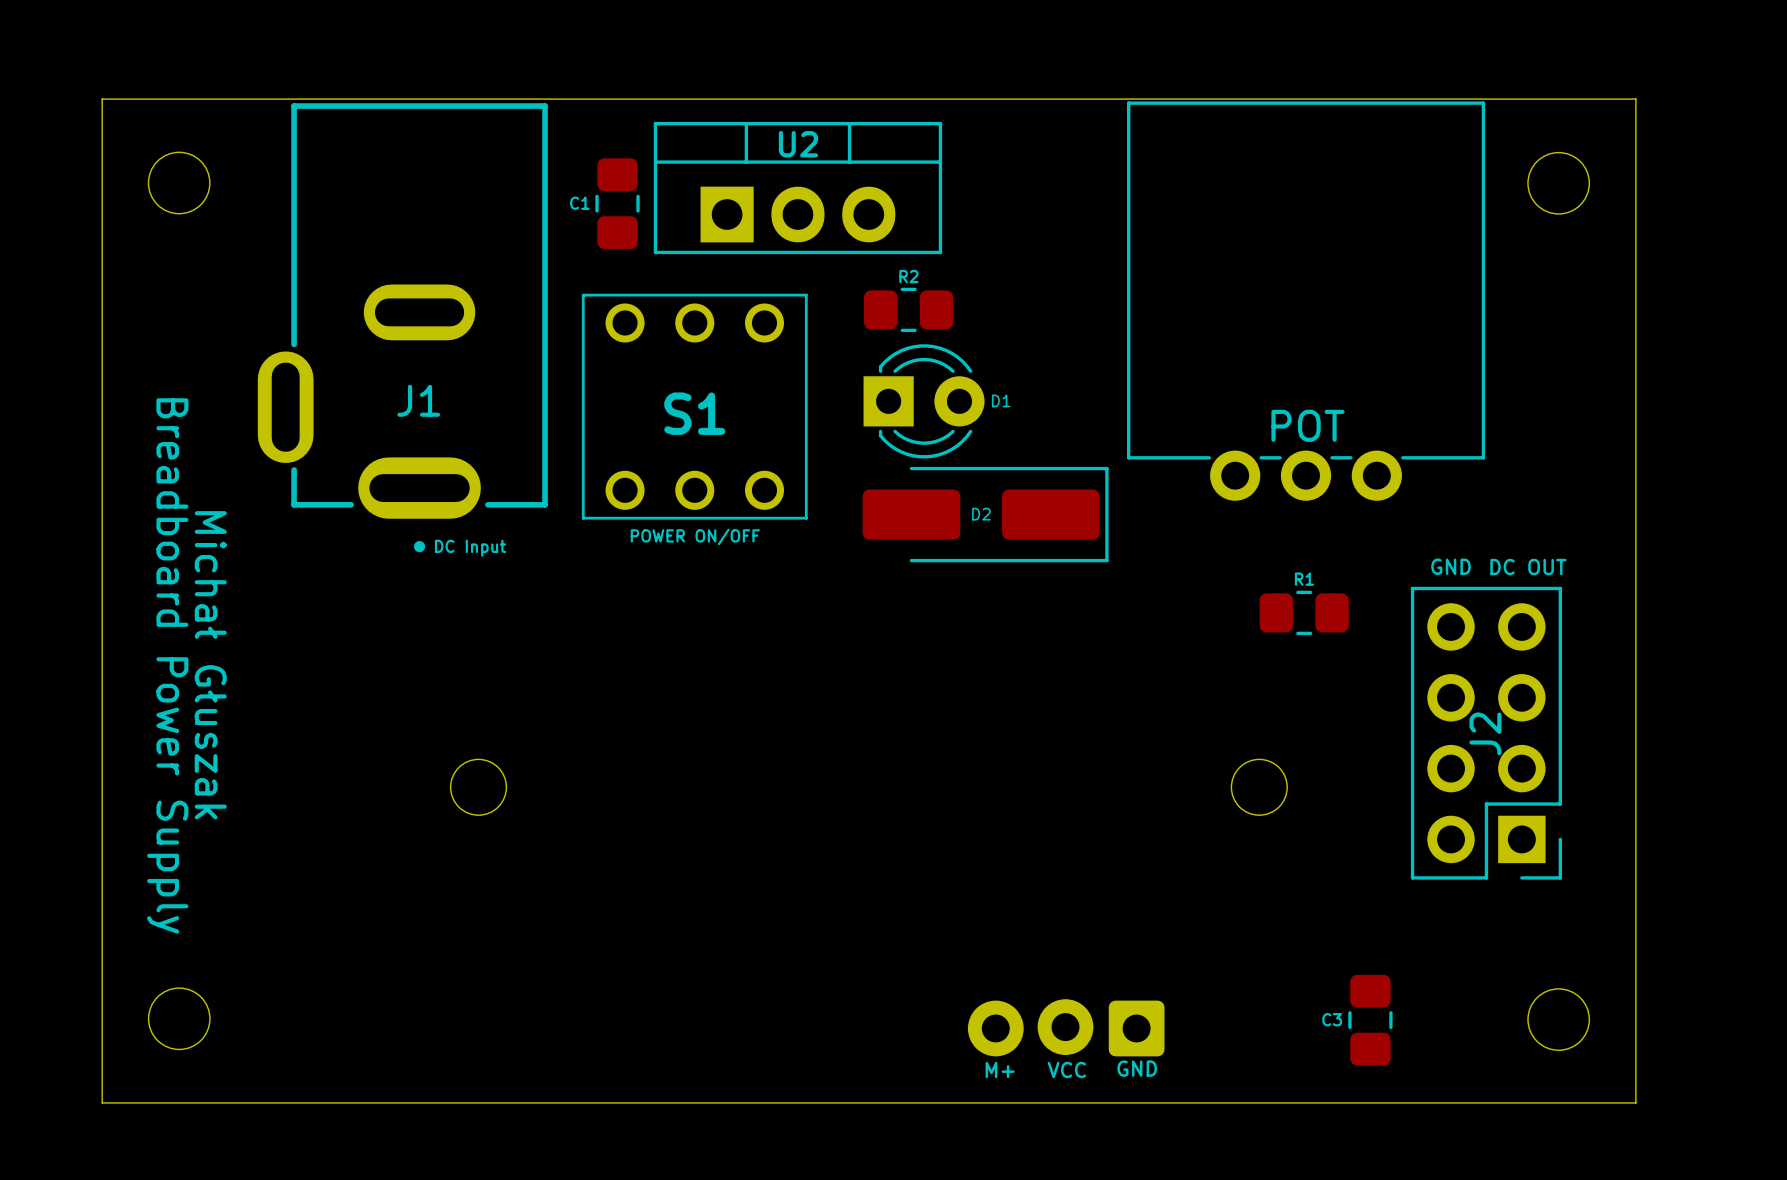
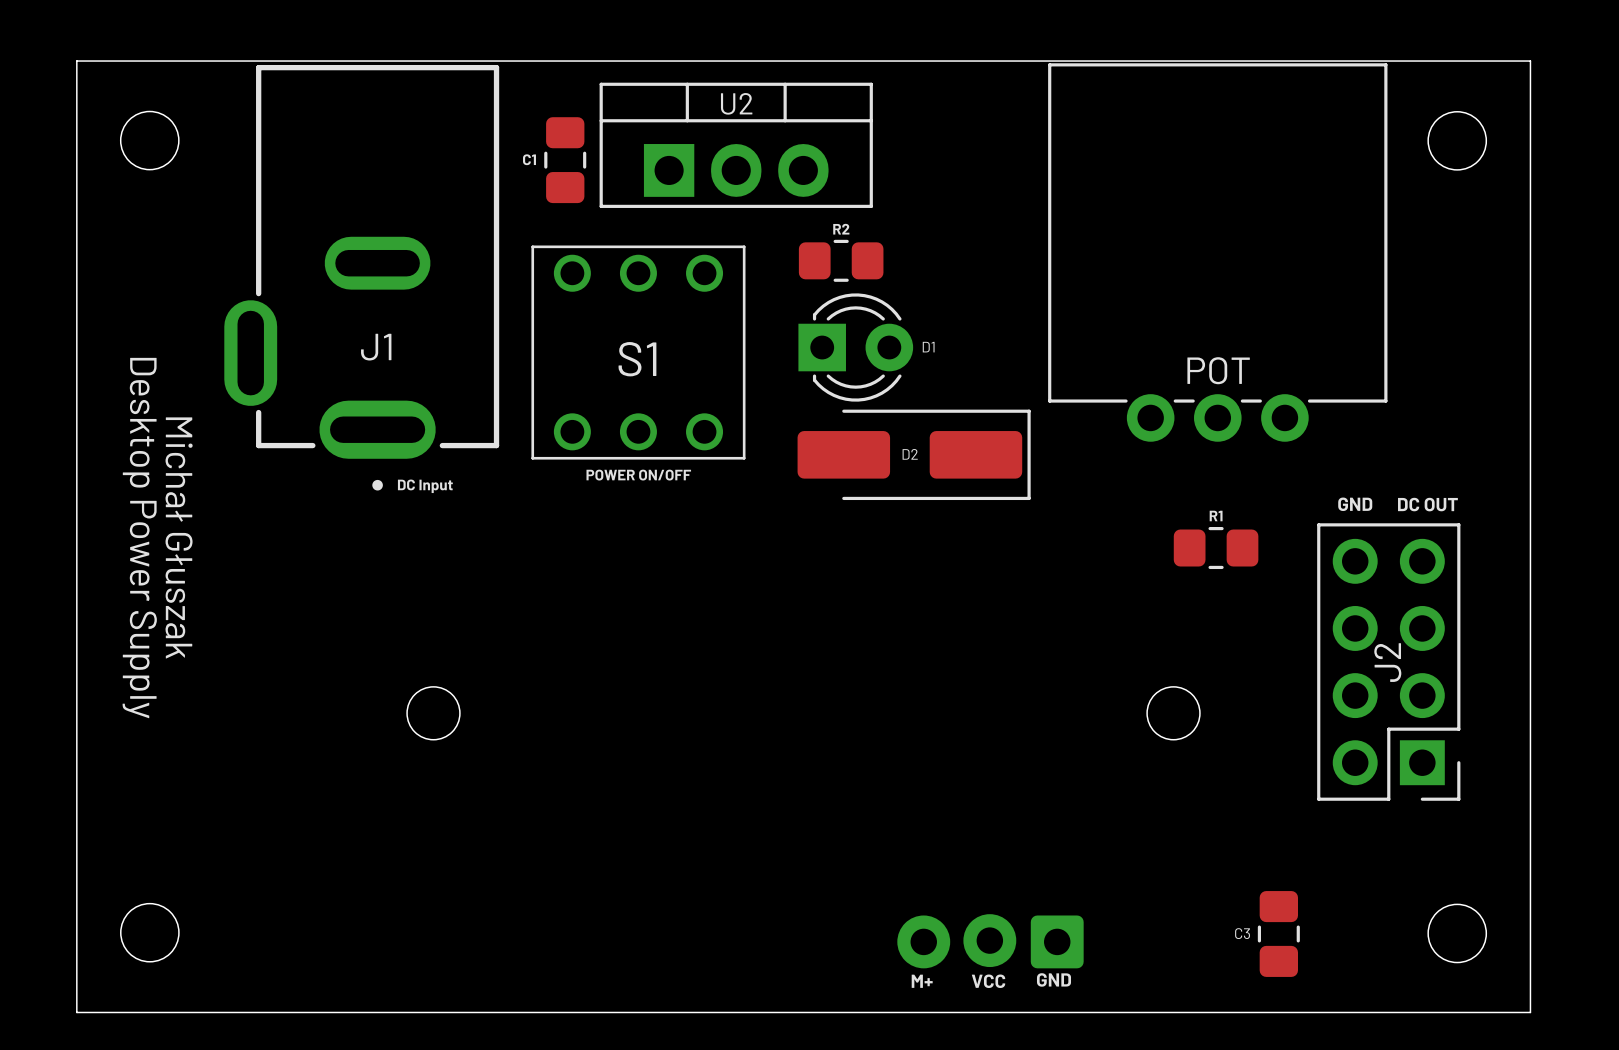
text: Breadboard Power Supply (167, 665) -> Desktop Power Supply (139, 538)
text position: Michał Głuszak (210, 665) -> Michał Głuszak (179, 537)

